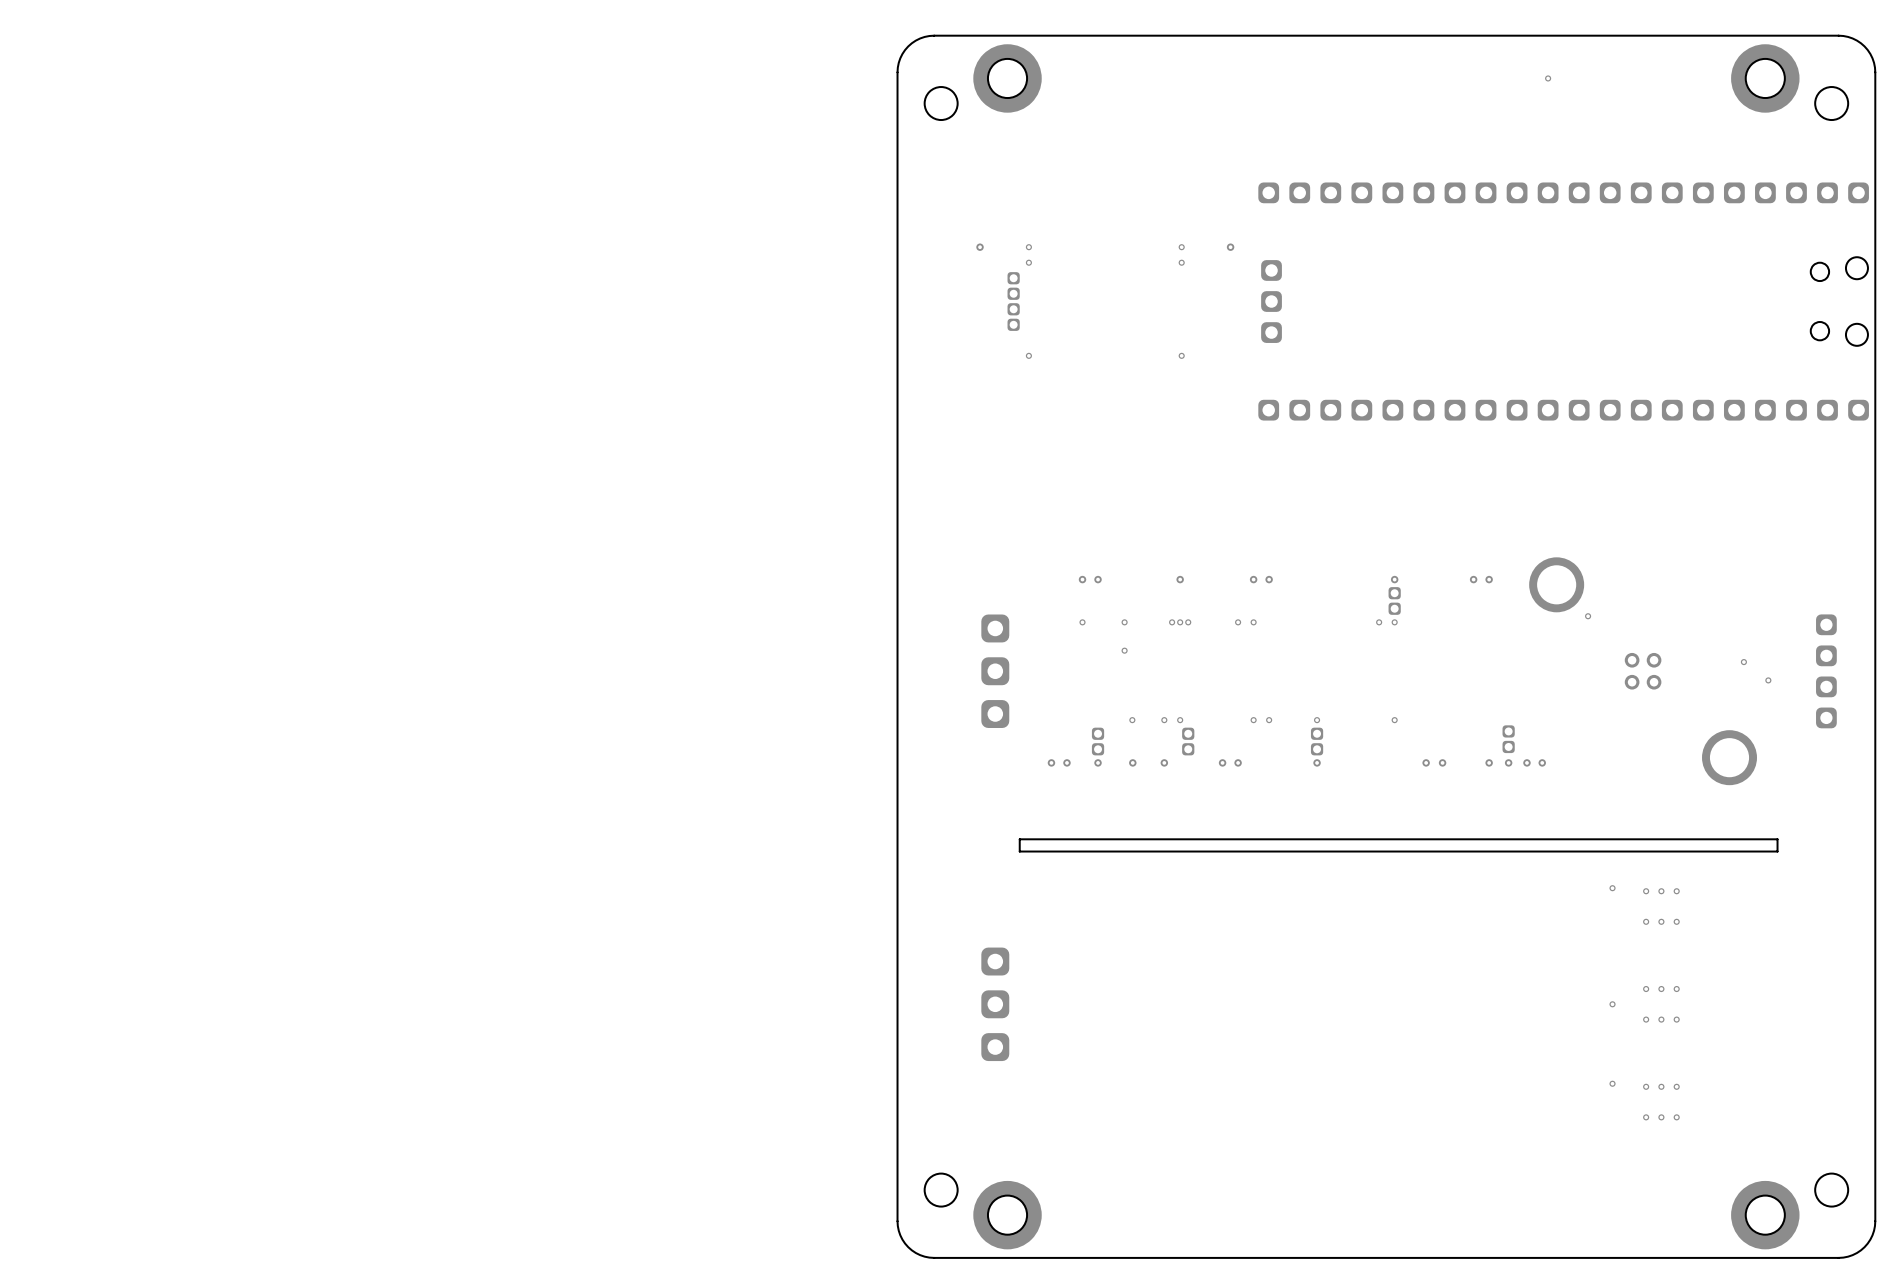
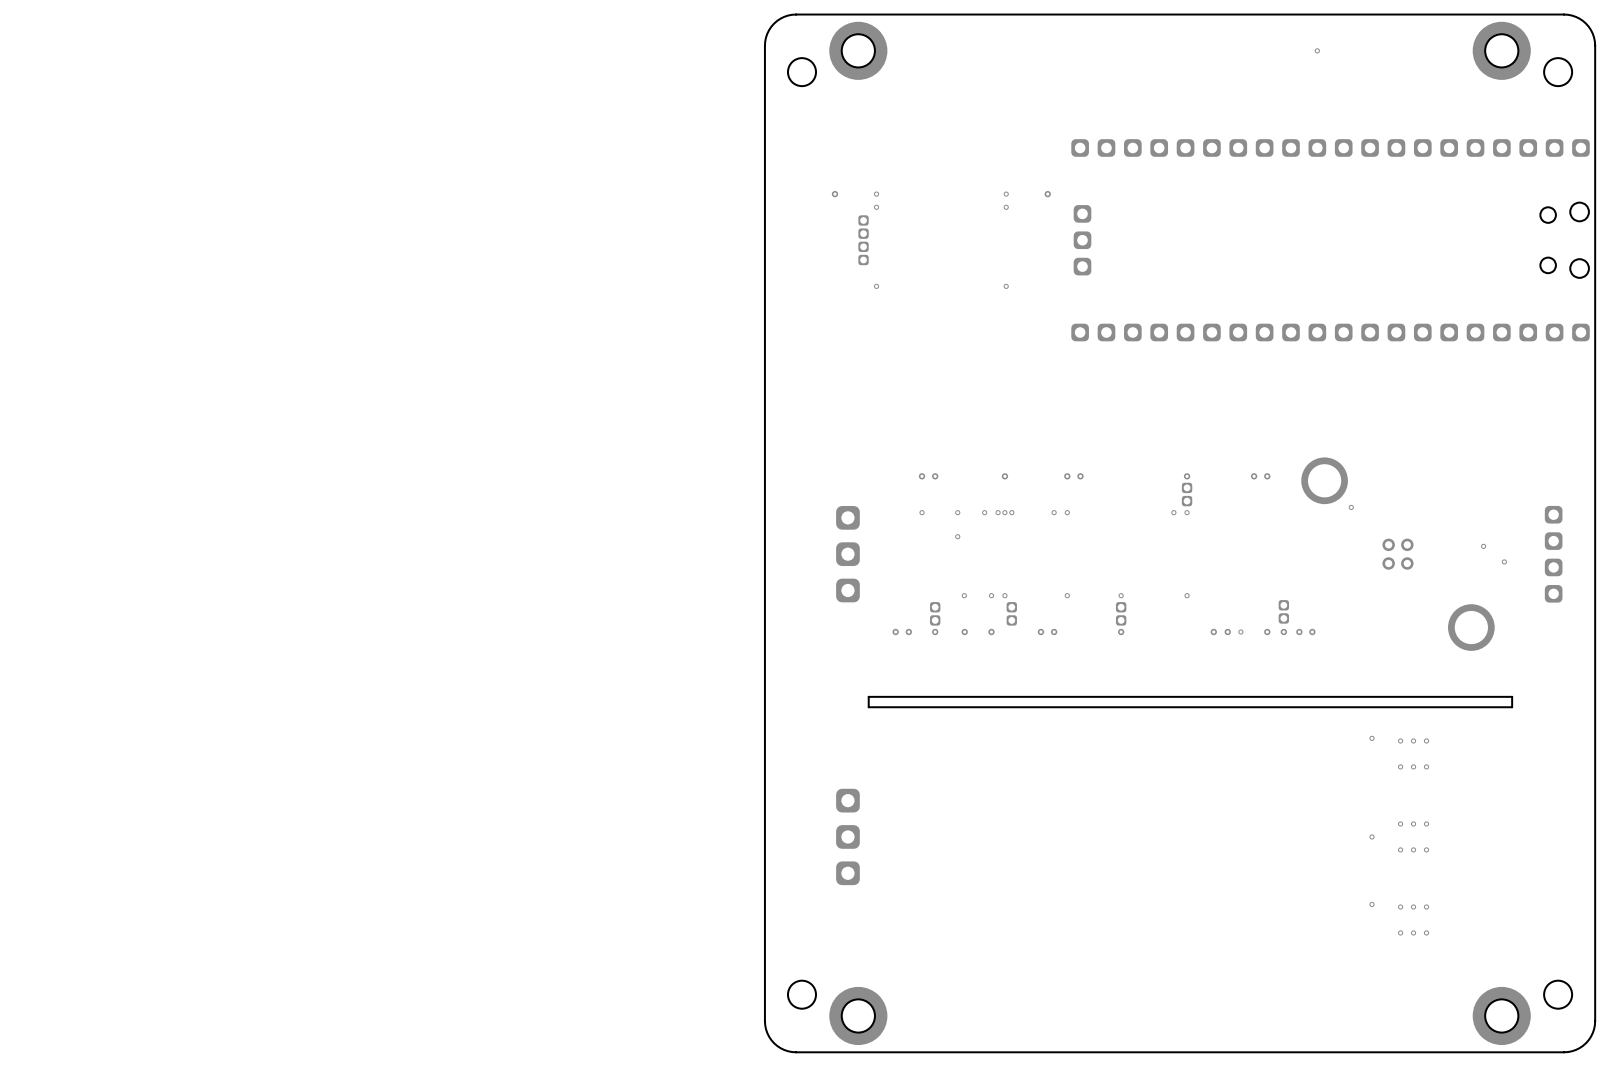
via: none -> (984, 512)
via: (1269, 720) -> none
via: none -> (1240, 632)

